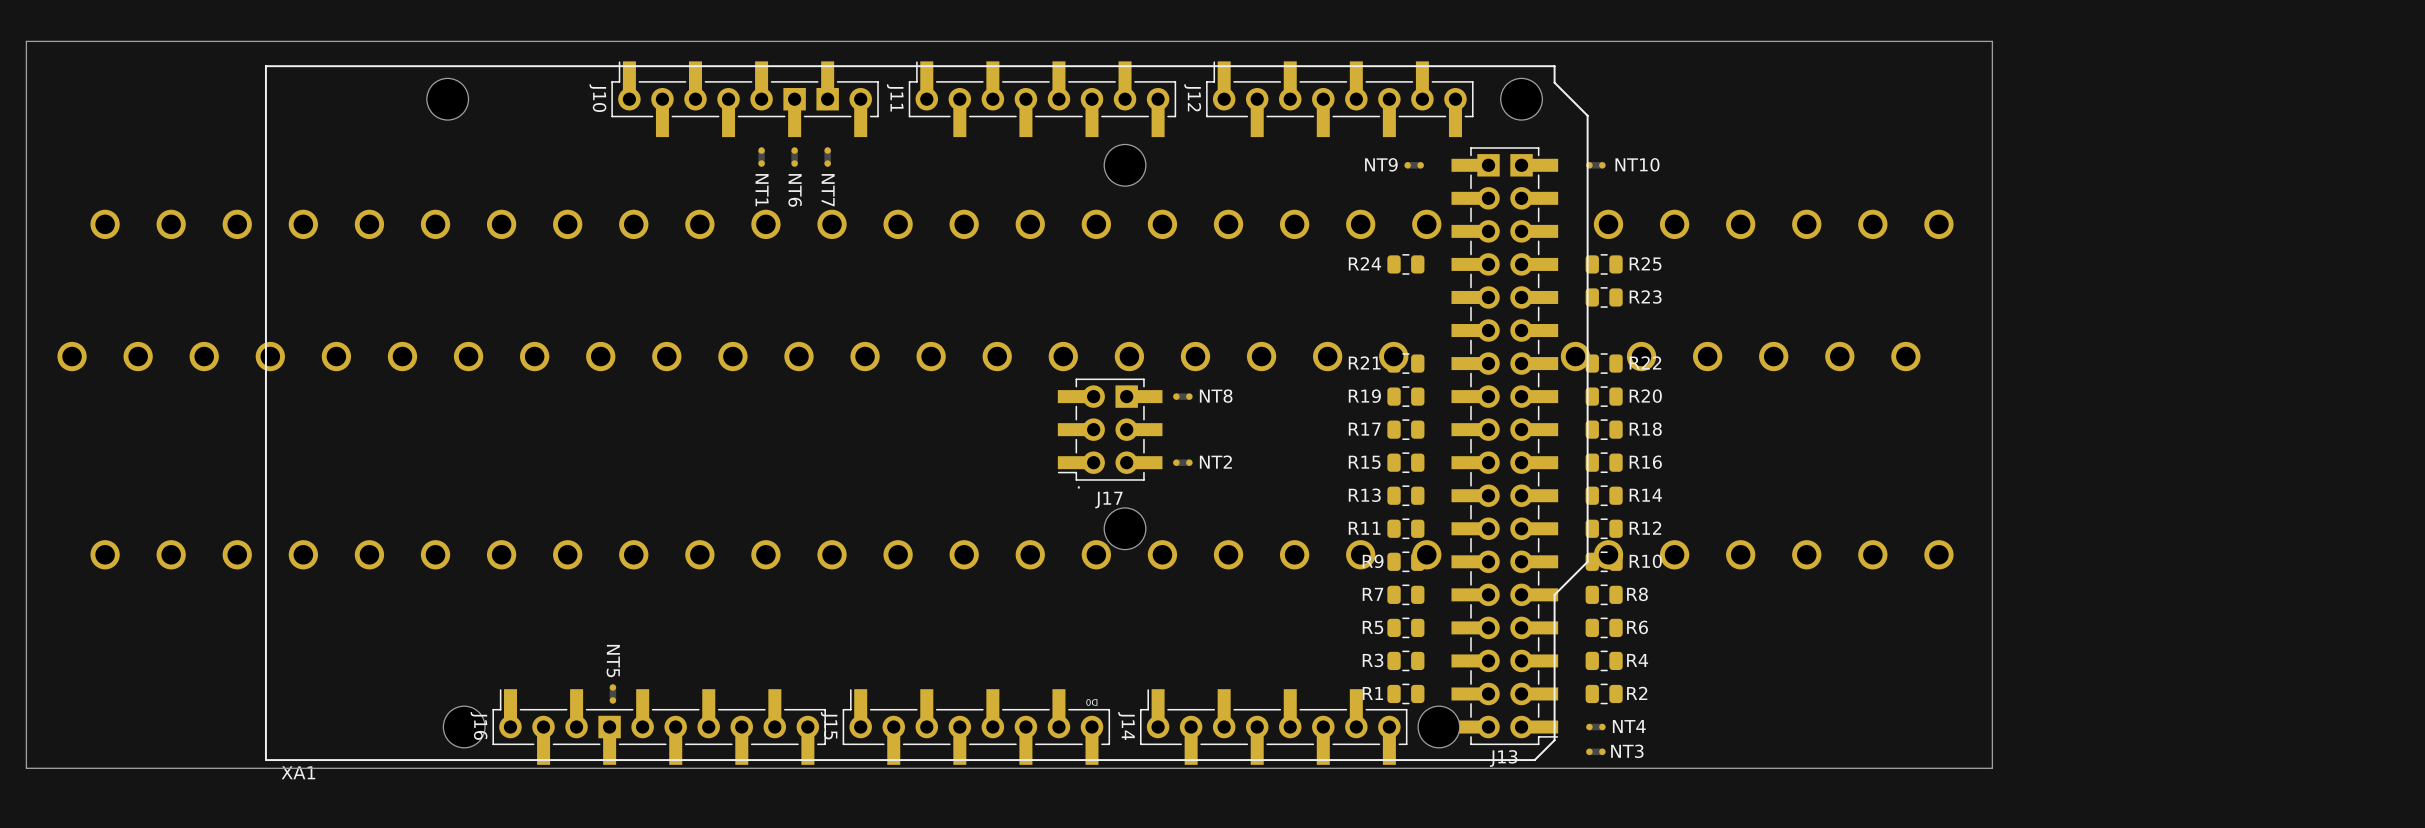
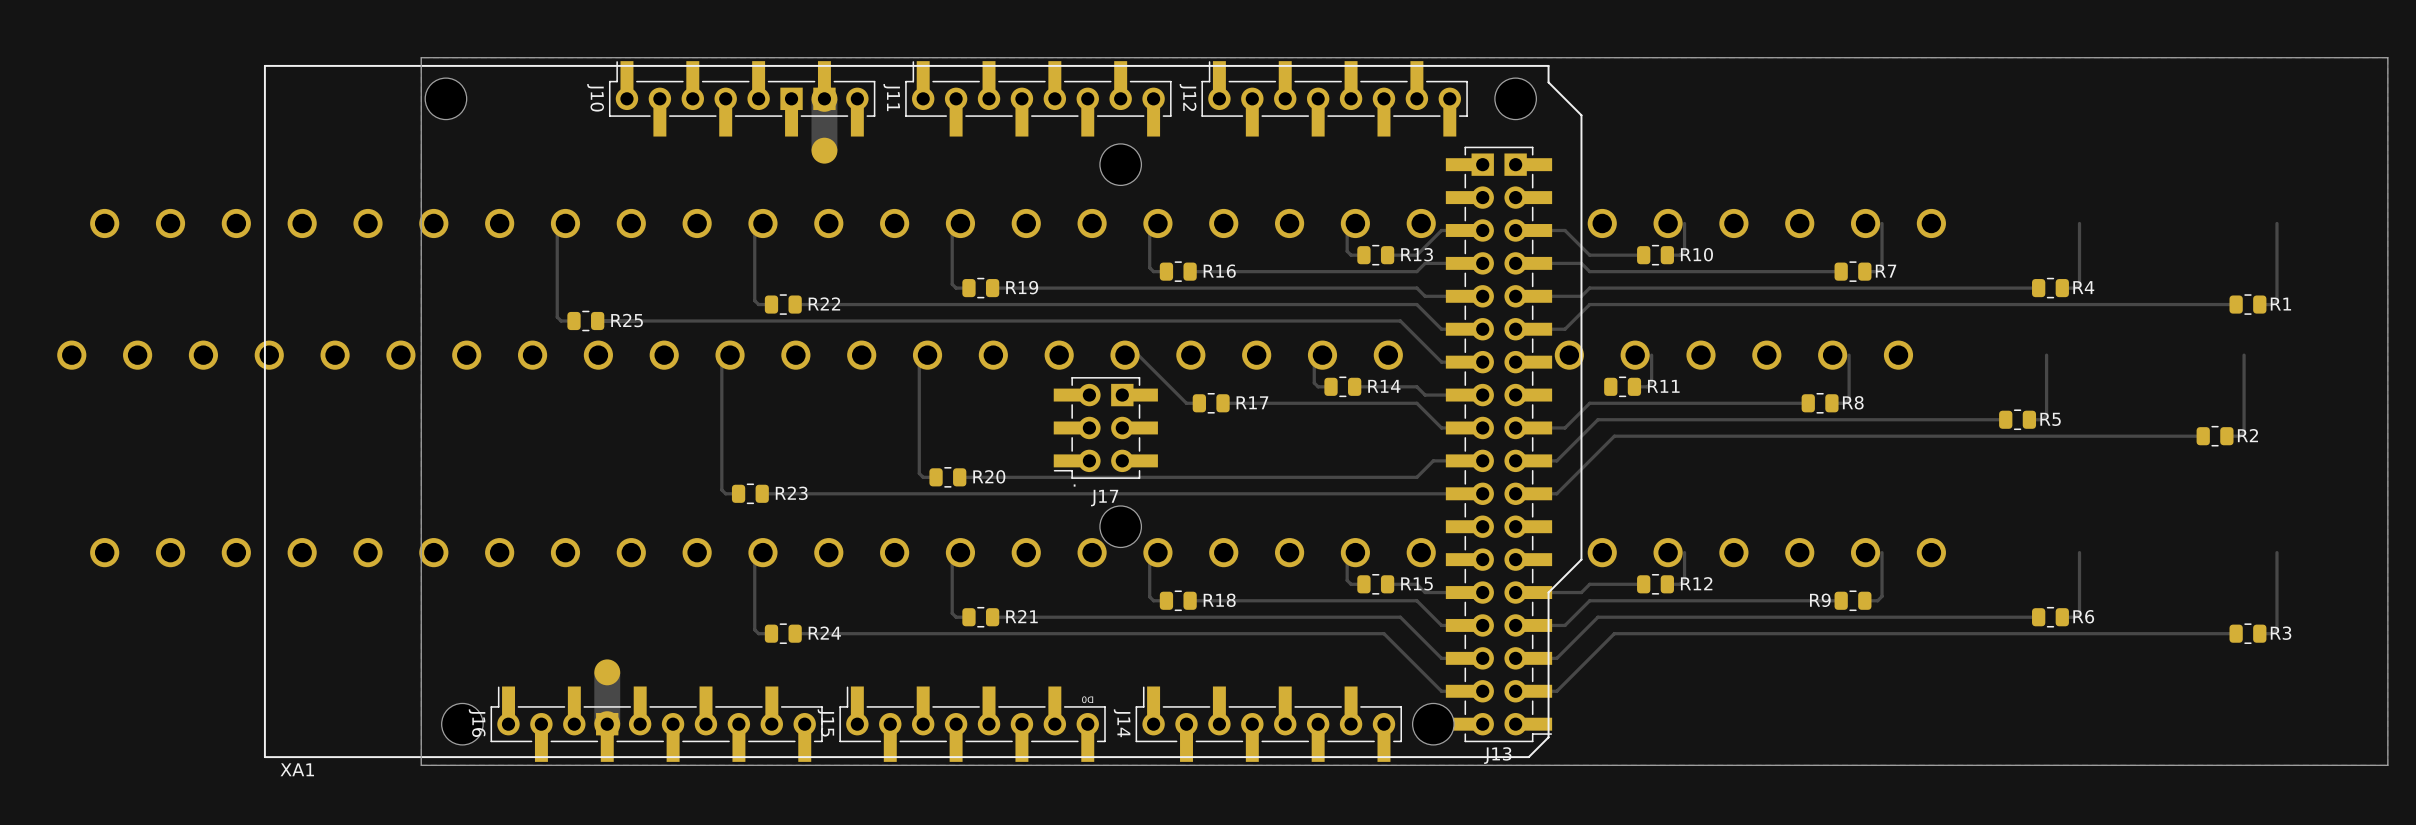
part: none -> (824, 124)
NT1: (761, 157) -> none
NT6: (794, 157) -> none
NT7: (827, 157) -> none
NT9: (1414, 165) -> none
NT10: (1595, 165) -> none
track: none -> (557, 223) (557, 317) (561, 321) (574, 321)
track: none -> (754, 223) (754, 300) (758, 304) (771, 304)
track: none -> (952, 223) (952, 284) (956, 288) (968, 288)
track: none -> (1149, 223) (1149, 267) (1153, 271) (1166, 271)
track: none -> (1347, 223) (1347, 251) (1351, 255) (1363, 255)
track: none -> (1684, 223) (1684, 250) (1680, 255) (1667, 255)
track: none -> (1882, 223) (1882, 267) (1877, 271) (1864, 271)
track: none -> (2079, 223) (2079, 283) (2075, 288) (2062, 288)
track: none -> (2276, 223) (2276, 300) (2272, 304) (2259, 304)
track: none -> (1466, 230) (1441, 230) (1416, 255) (1387, 255)
track: none -> (1515, 230) (1565, 230) (1589, 255) (1643, 255)
R24 name position: R24 (1364, 263) -> R24 (824, 633)
R24 position: (1405, 264) -> (783, 633)
track: none -> (1482, 263) (1425, 263) (1416, 271) (1193, 271)
track: none -> (1515, 263) (1581, 263) (1589, 271) (1841, 271)
R25 position: (1604, 264) -> (585, 321)
track: none -> (992, 288) (1416, 288) (1425, 296) (1482, 296)
track: none -> (2038, 288) (1589, 288) (1581, 296) (1515, 296)
R23 position: (1604, 297) -> (750, 493)
track: none -> (795, 304) (1416, 304) (1441, 329) (1482, 329)
track: none -> (2236, 304) (1589, 304) (1565, 329) (1515, 329)
track: none -> (597, 321) (1400, 321) (1441, 362) (1482, 362)
track: none -> (721, 355) (721, 489) (725, 493) (738, 493)
track: none -> (919, 355) (919, 473) (923, 477) (936, 477)
track: none -> (1116, 355) (1138, 355) (1186, 403) (1199, 403)
track: none -> (1314, 355) (1314, 382) (1318, 386) (1331, 386)
track: none -> (1651, 355) (1651, 382) (1647, 386) (1634, 386)
track: none -> (1849, 355) (1849, 398) (1844, 403) (1831, 403)
track: none -> (2046, 355) (2046, 415) (2042, 419) (2029, 419)
track: none -> (2244, 355) (2244, 431) (2239, 436) (2226, 436)
R21 name position: R21 (1364, 362) -> R21 (1021, 616)
R21 position: (1405, 363) -> (980, 617)
R22 position: (1604, 363) -> (783, 304)
track: none -> (1354, 386) (1416, 386) (1425, 395) (1482, 395)
NT8: (1182, 396) -> none
R19 name position: R19 (1364, 396) -> R19 (1022, 287)
R19 position: (1405, 396) -> (980, 288)
R20 position: (1604, 396) -> (947, 477)
track: none -> (1223, 403) (1416, 403) (1441, 427) (1466, 427)
track: none -> (1808, 403) (1589, 403) (1565, 427) (1515, 427)
track: none -> (2005, 419) (1597, 419) (1556, 460) (1515, 460)
R17 name position: R17 (1364, 429) -> R17 (1252, 402)
R17 position: (1405, 429) -> (1211, 403)
R18 position: (1604, 429) -> (1178, 600)
track: none -> (2203, 436) (1614, 436) (1556, 493) (1515, 493)
NT2: (1182, 462) -> none
R15 name position: R15 (1364, 462) -> R15 (1416, 583)
R15 position: (1405, 462) -> (1375, 584)
track: none -> (1482, 460) (1433, 460) (1416, 477) (959, 477)
R16 position: (1604, 462) -> (1178, 271)
R13 name position: R13 (1364, 495) -> R13 (1417, 254)
R13 position: (1405, 495) -> (1375, 255)
track: none -> (1482, 493) (762, 493)
R14 position: (1604, 495) -> (1342, 386)
R11 name position: R11 (1364, 528) -> R11 (1663, 386)
R11 position: (1405, 528) -> (1622, 386)
R12 position: (1604, 528) -> (1655, 584)
track: none -> (754, 552) (754, 629) (758, 633) (771, 633)
track: none -> (952, 552) (952, 613) (956, 617) (968, 617)
track: none -> (1149, 552) (1149, 596) (1153, 600) (1166, 600)
track: none -> (1347, 552) (1347, 580) (1351, 584) (1363, 584)
track: none -> (1684, 552) (1684, 579) (1680, 584) (1667, 584)
track: none -> (1882, 552) (1882, 596) (1877, 600) (1864, 600)
track: none -> (2079, 552) (2079, 612) (2075, 617) (2062, 617)
track: none -> (2276, 552) (2276, 629) (2272, 633) (2259, 633)
R9 position: (1405, 561) -> (1853, 600)
R10 position: (1604, 561) -> (1655, 255)
track: none -> (1387, 584) (1416, 584) (1425, 592) (1482, 592)
track: none -> (1643, 584) (1589, 584) (1581, 592) (1515, 592)
R7 name position: R7 (1372, 594) -> R7 (1886, 271)
R7 position: (1405, 594) -> (1853, 271)
R8 position: (1604, 594) -> (1820, 403)
track: none -> (1190, 600) (1416, 600) (1441, 625) (1482, 625)
track: none -> (1841, 600) (1589, 600) (1565, 625) (1515, 625)
track: none -> (992, 617) (1400, 617) (1441, 658) (1482, 658)
track: none -> (2038, 617) (1597, 617) (1556, 658) (1515, 658)
R5 name position: R5 (1372, 627) -> R5 (2050, 419)
R5 position: (1405, 627) -> (2017, 419)
R6 position: (1604, 627) -> (2050, 617)
track: none -> (795, 633) (1383, 633) (1441, 691) (1466, 691)
track: none -> (2236, 633) (1614, 633) (1556, 691) (1515, 691)
R3 name position: R3 (1373, 660) -> R3 (2281, 633)
R3 position: (1405, 660) -> (2247, 633)
R4 position: (1604, 660) -> (2050, 288)
NT5: (612, 693) -> none
R1 name position: R1 (1372, 693) -> R1 (2280, 304)
R1 position: (1405, 693) -> (2247, 304)
R2 position: (1604, 693) -> (2215, 436)
part: none -> (607, 698)
NT4: (1595, 727) -> none
NT3: (1595, 751) -> none
board edge: (1992, 768) (1992, 41) (26, 41) (26, 768) (422, 768) -> (1984, 765) (2387, 765) (2387, 57) (421, 57) (421, 765)

